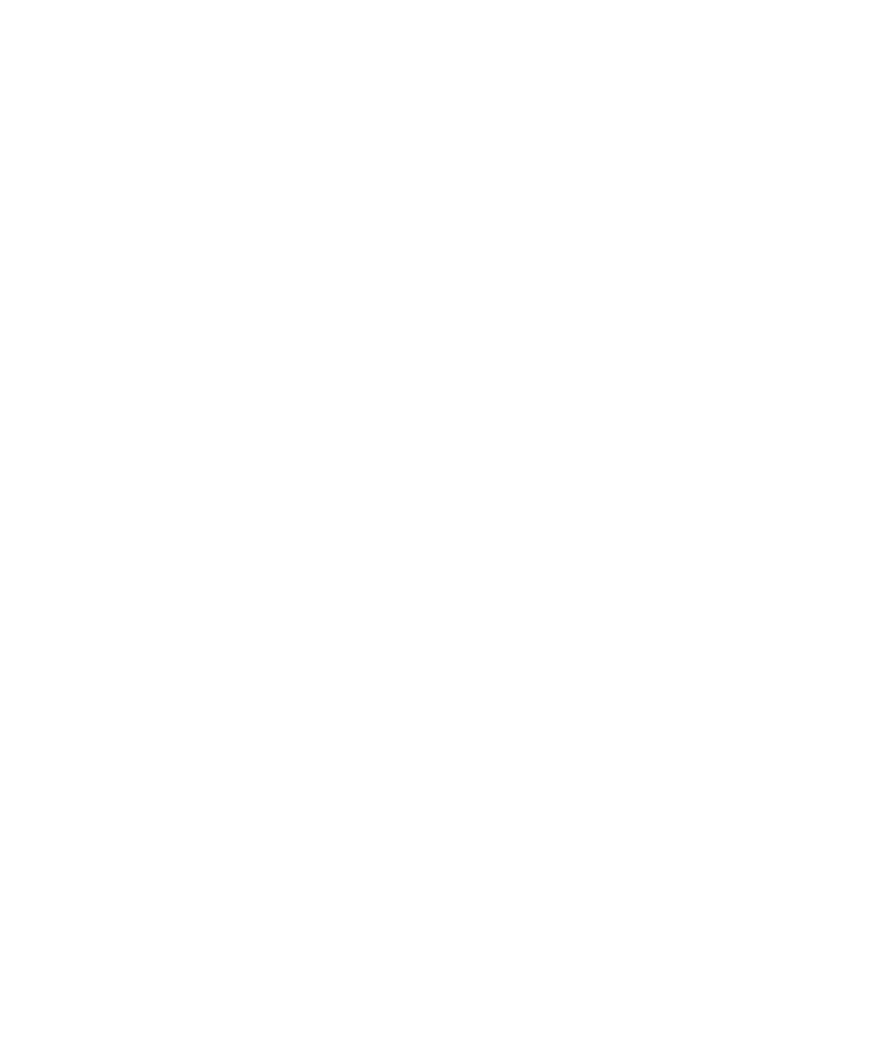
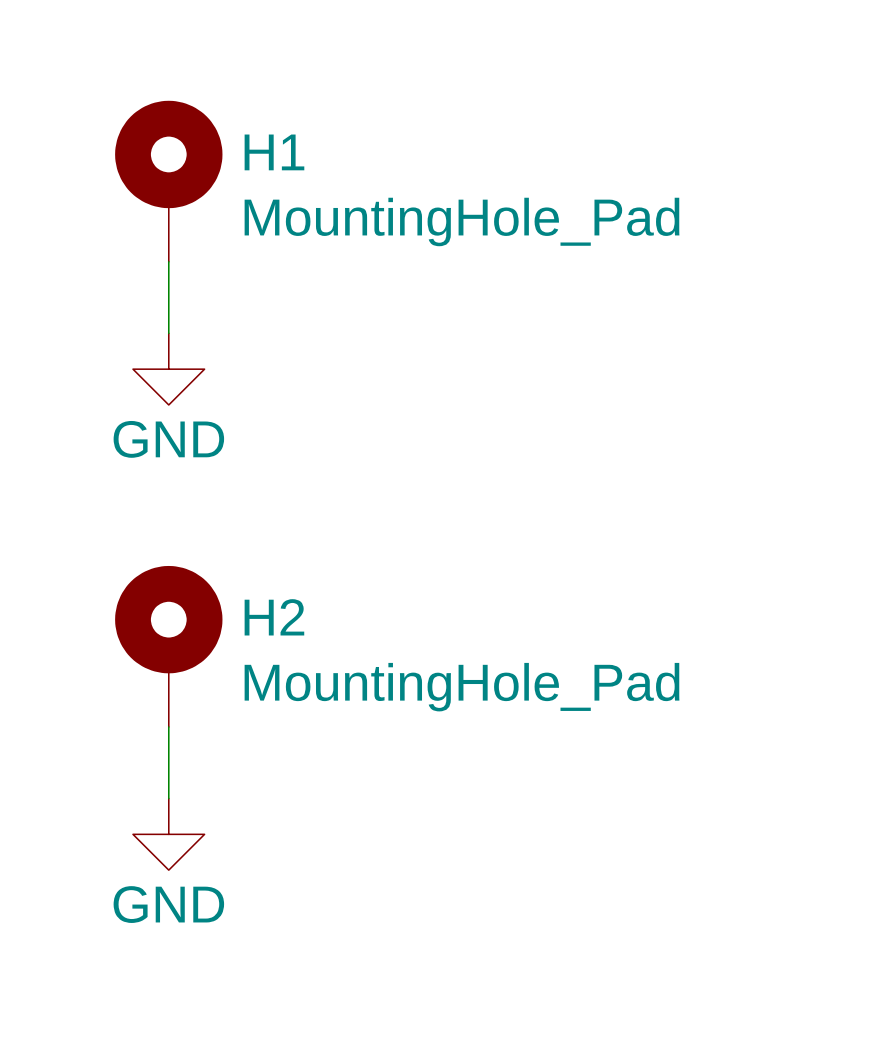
H1: none -> MountingHole_Pad (168, 181)
wire: none -> (168, 261) (168, 333)
power symbol: none -> GND (168, 369)
H2: none -> MountingHole_Pad (168, 646)
wire: none -> (168, 726) (168, 798)
power symbol: none -> GND (168, 834)

